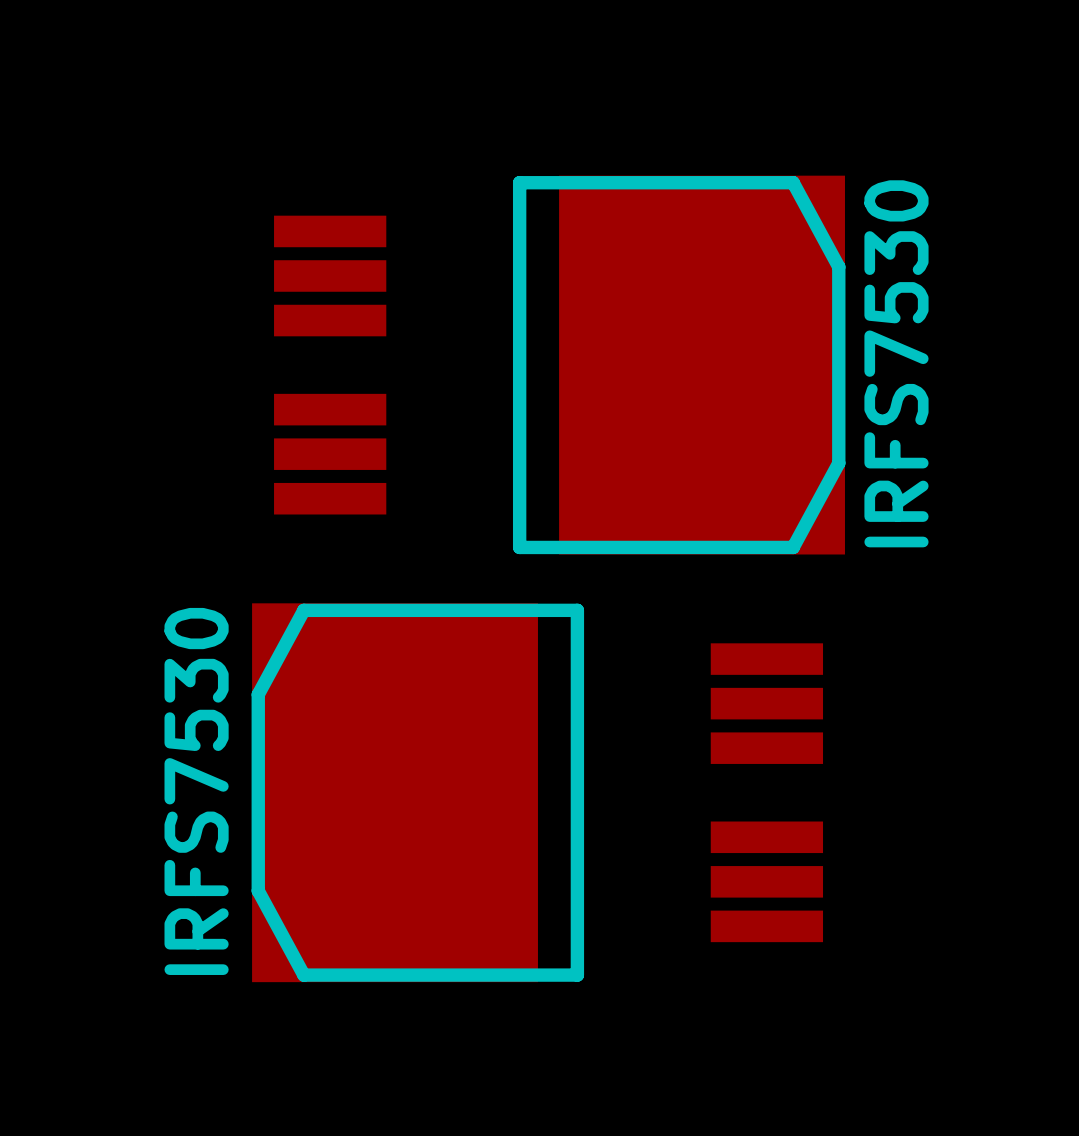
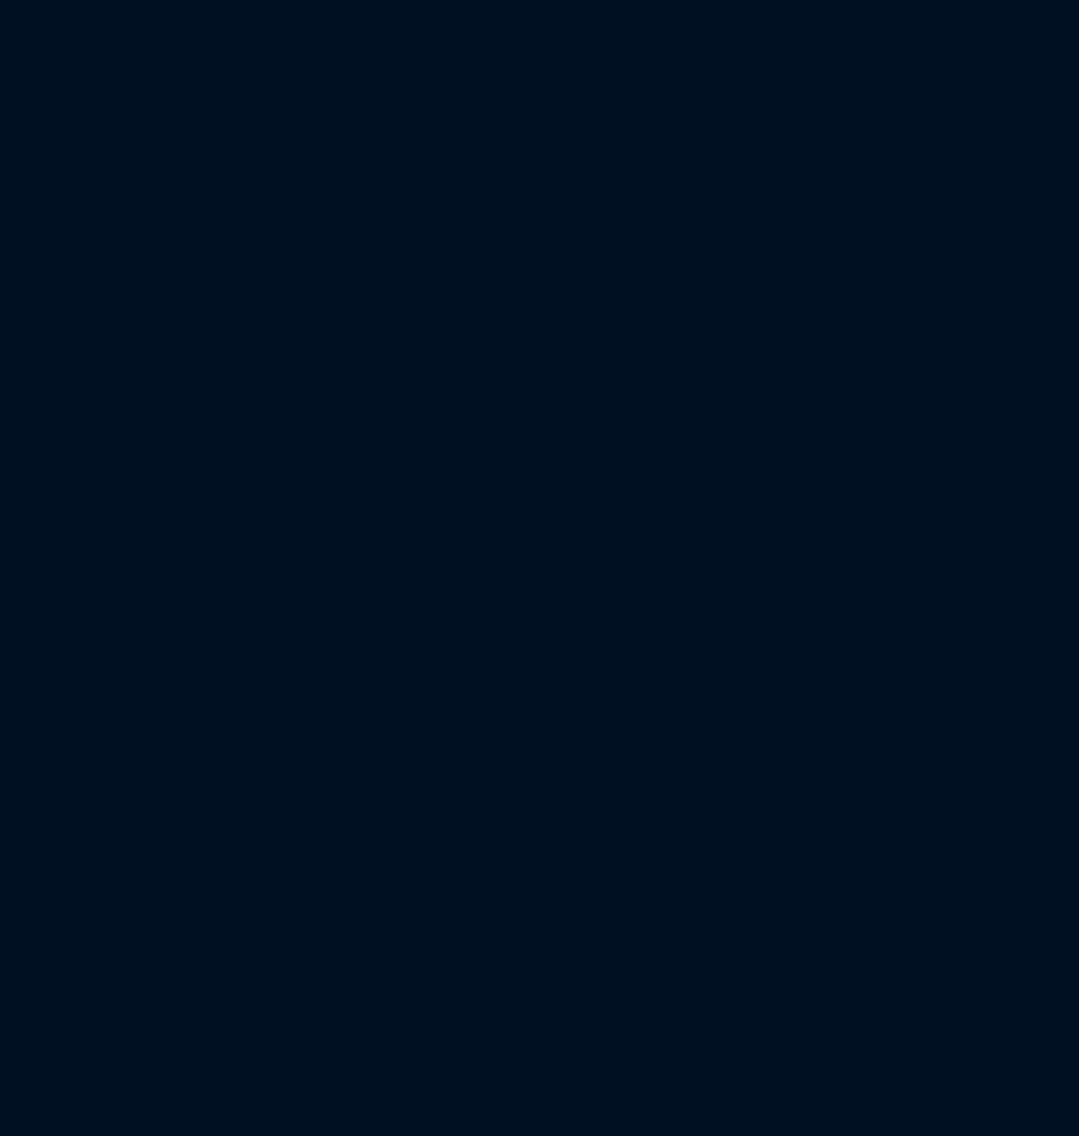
part: IRFS7530 (559, 365) -> none
part: IRFS7530 (537, 792) -> none

